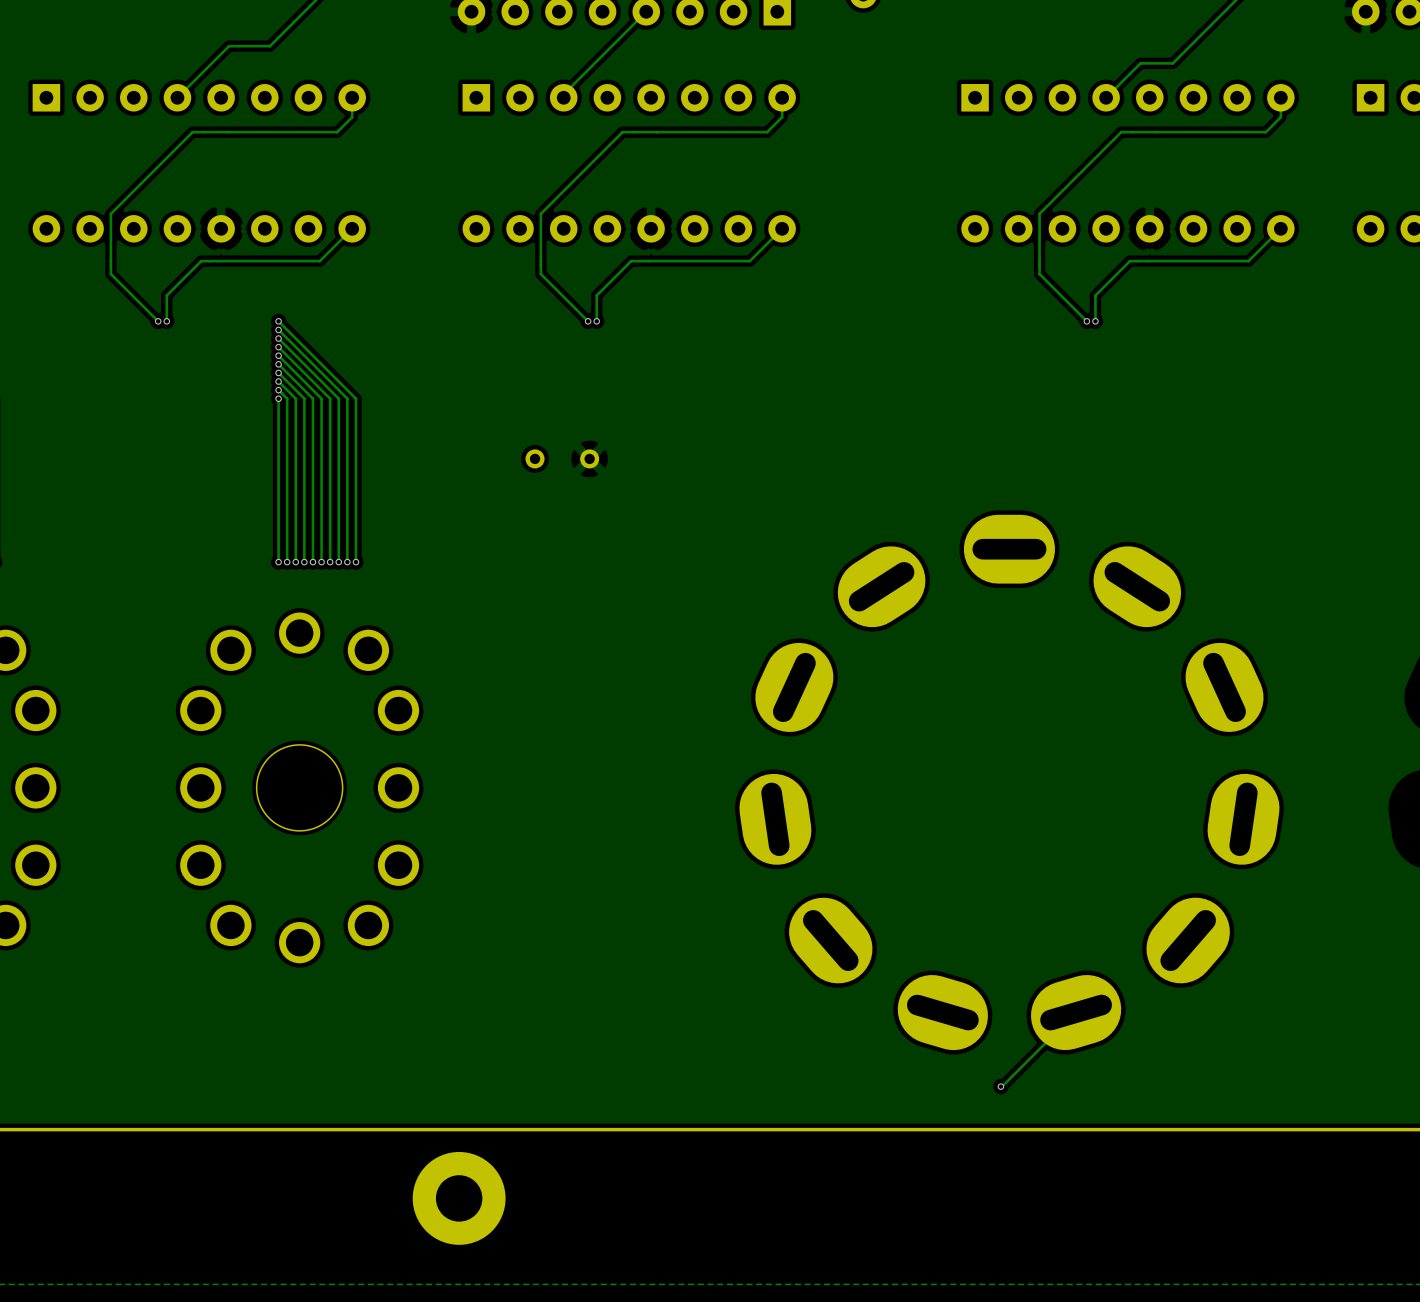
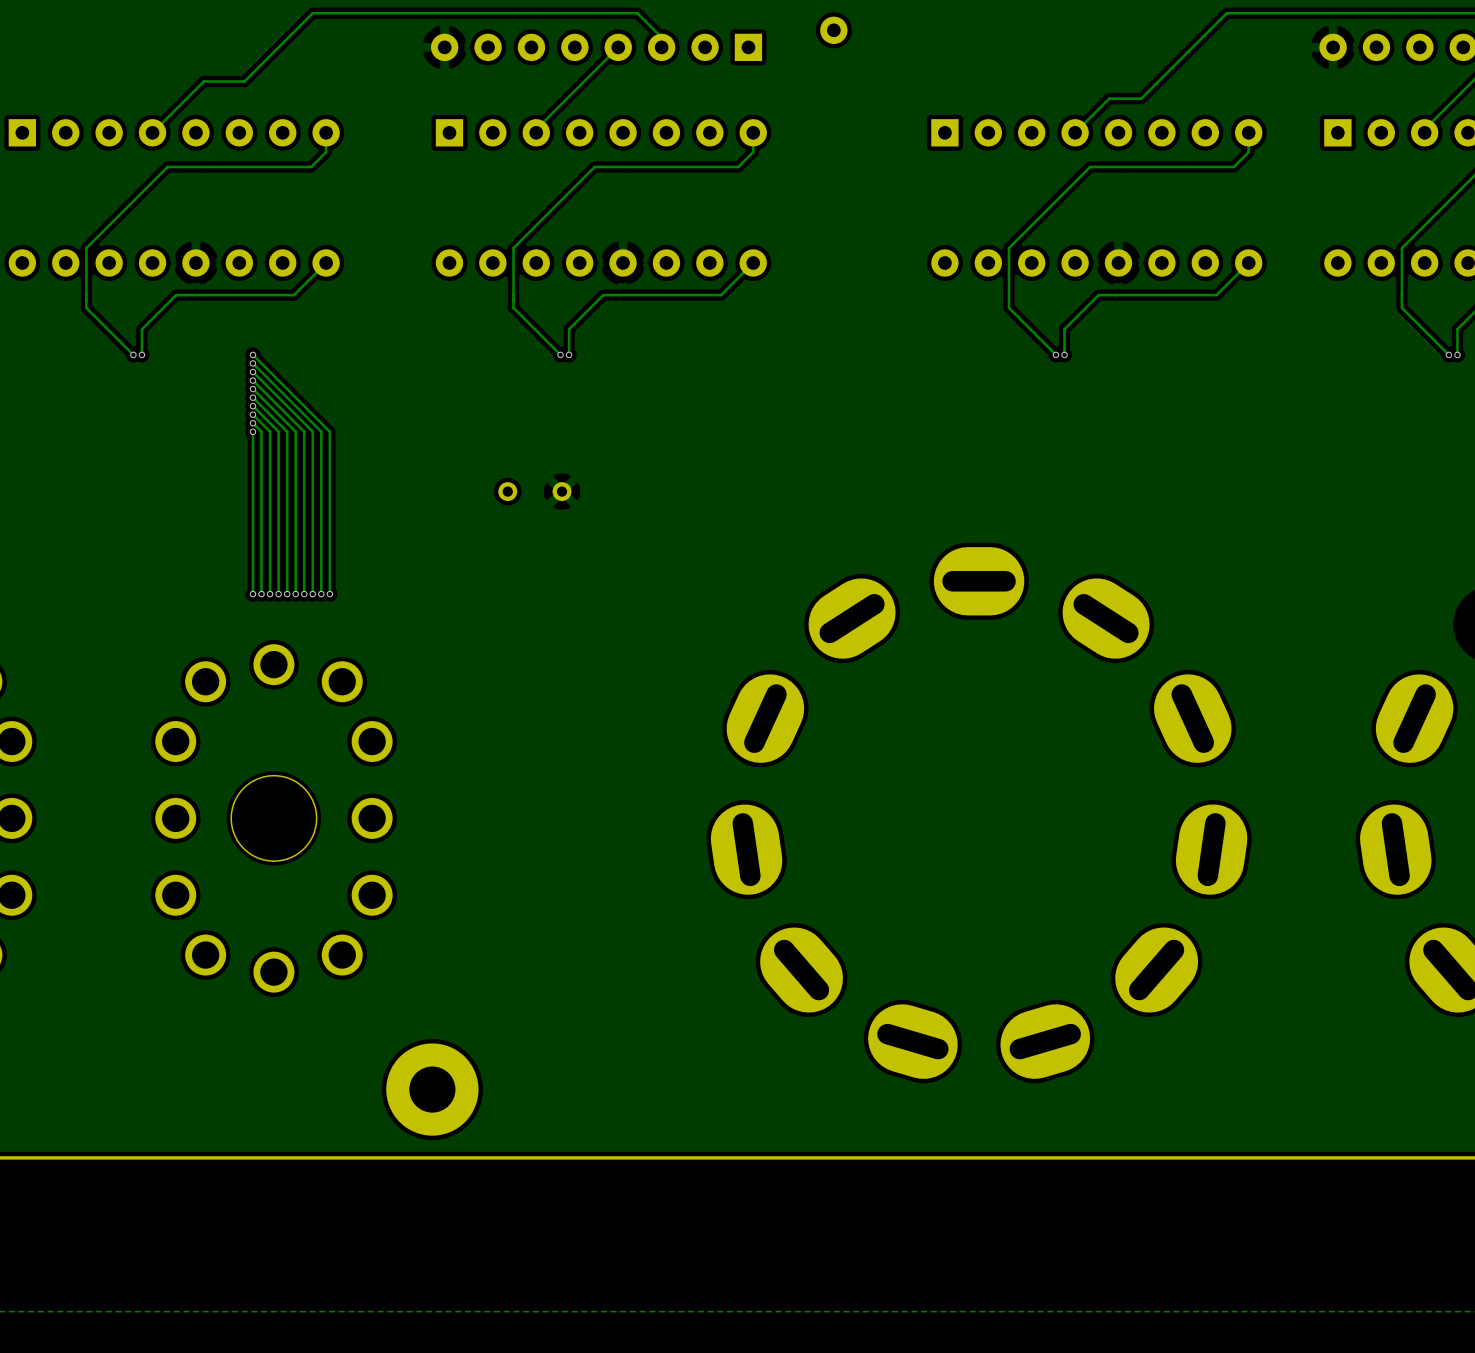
track: (1076, 1012) (1002, 1086) -> none
via: (1000, 1086) -> none
part position: (459, 1198) -> (432, 1089)

